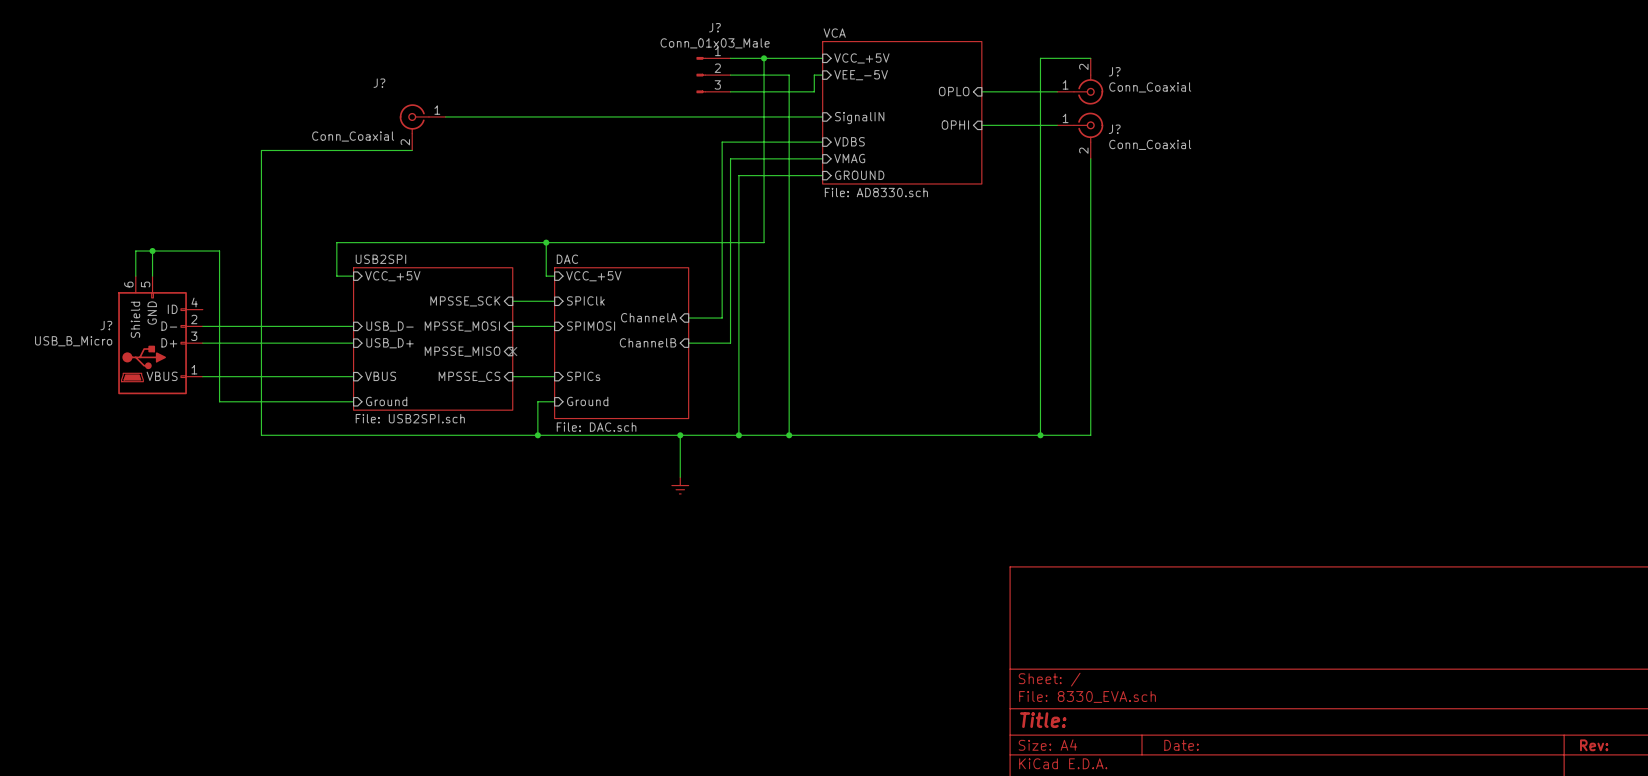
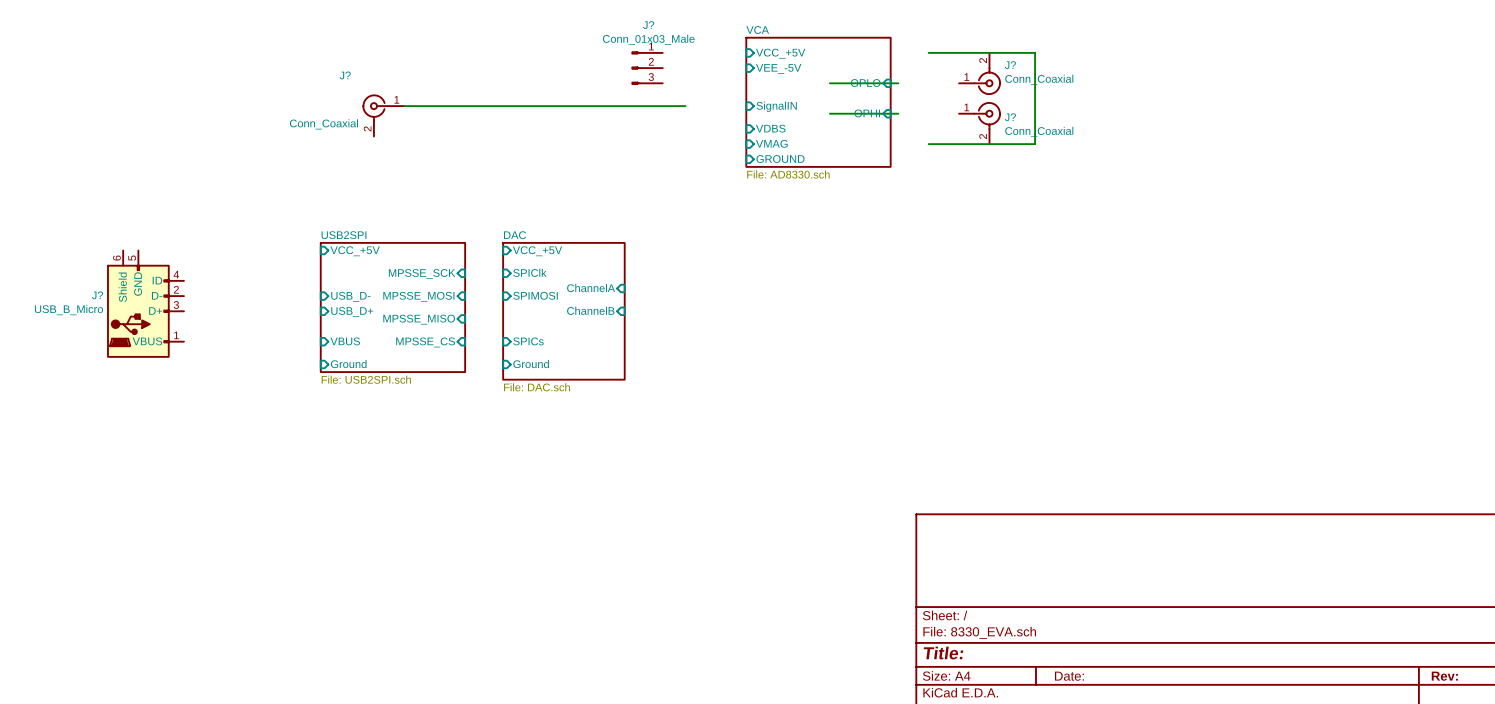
wire: (730, 58) (822, 58) -> none
wire: (764, 58) (764, 242) (336, 242) (336, 276) (353, 276) -> none
junction: (764, 58) -> none
wire: (1040, 58) (1040, 435) -> (943, 52) (928, 52)
wire: none -> (989, 52) (1035, 52) (1035, 144) (928, 144)
wire: (730, 75) (789, 75) (789, 435) -> none
wire: (822, 75) (814, 75) (814, 91) (730, 91) -> none
wire: (990, 91) (1057, 91) -> (829, 83) (890, 83)
wire: (755, 116) (822, 116) -> none
wire: (990, 125) (1057, 125) -> (829, 113) (890, 113)
wire: (822, 142) (722, 142) (722, 318) (688, 318) -> none
wire: (412, 150) (261, 150) (261, 435) (1090, 435) (1090, 158) -> none
wire: (822, 158) (730, 158) (730, 343) (688, 343) -> none
wire: (822, 175) (738, 175) (738, 435) -> none
wire: (546, 242) (546, 276) (554, 276) -> none
junction: (546, 242) -> none
wire: (152, 251) (152, 276) -> none
junction: (152, 251) -> none
wire: (135, 276) (135, 251) (219, 251) (219, 401) (353, 401) -> none
wire: (512, 301) (554, 301) -> none
wire: (202, 326) (353, 326) -> none
wire: (512, 326) (554, 326) -> none
wire: (202, 343) (353, 343) -> none
no-connect mark: (512, 351) -> none
wire: (202, 376) (353, 376) -> none
wire: (512, 376) (554, 376) -> none
wire: (554, 401) (537, 401) (537, 435) -> none
junction: (537, 435) -> none
wire: (680, 435) (680, 477) -> none
junction: (680, 435) -> none
junction: (738, 435) -> none
junction: (789, 435) -> none
junction: (1040, 435) -> none
power symbol: (680, 485) -> none

